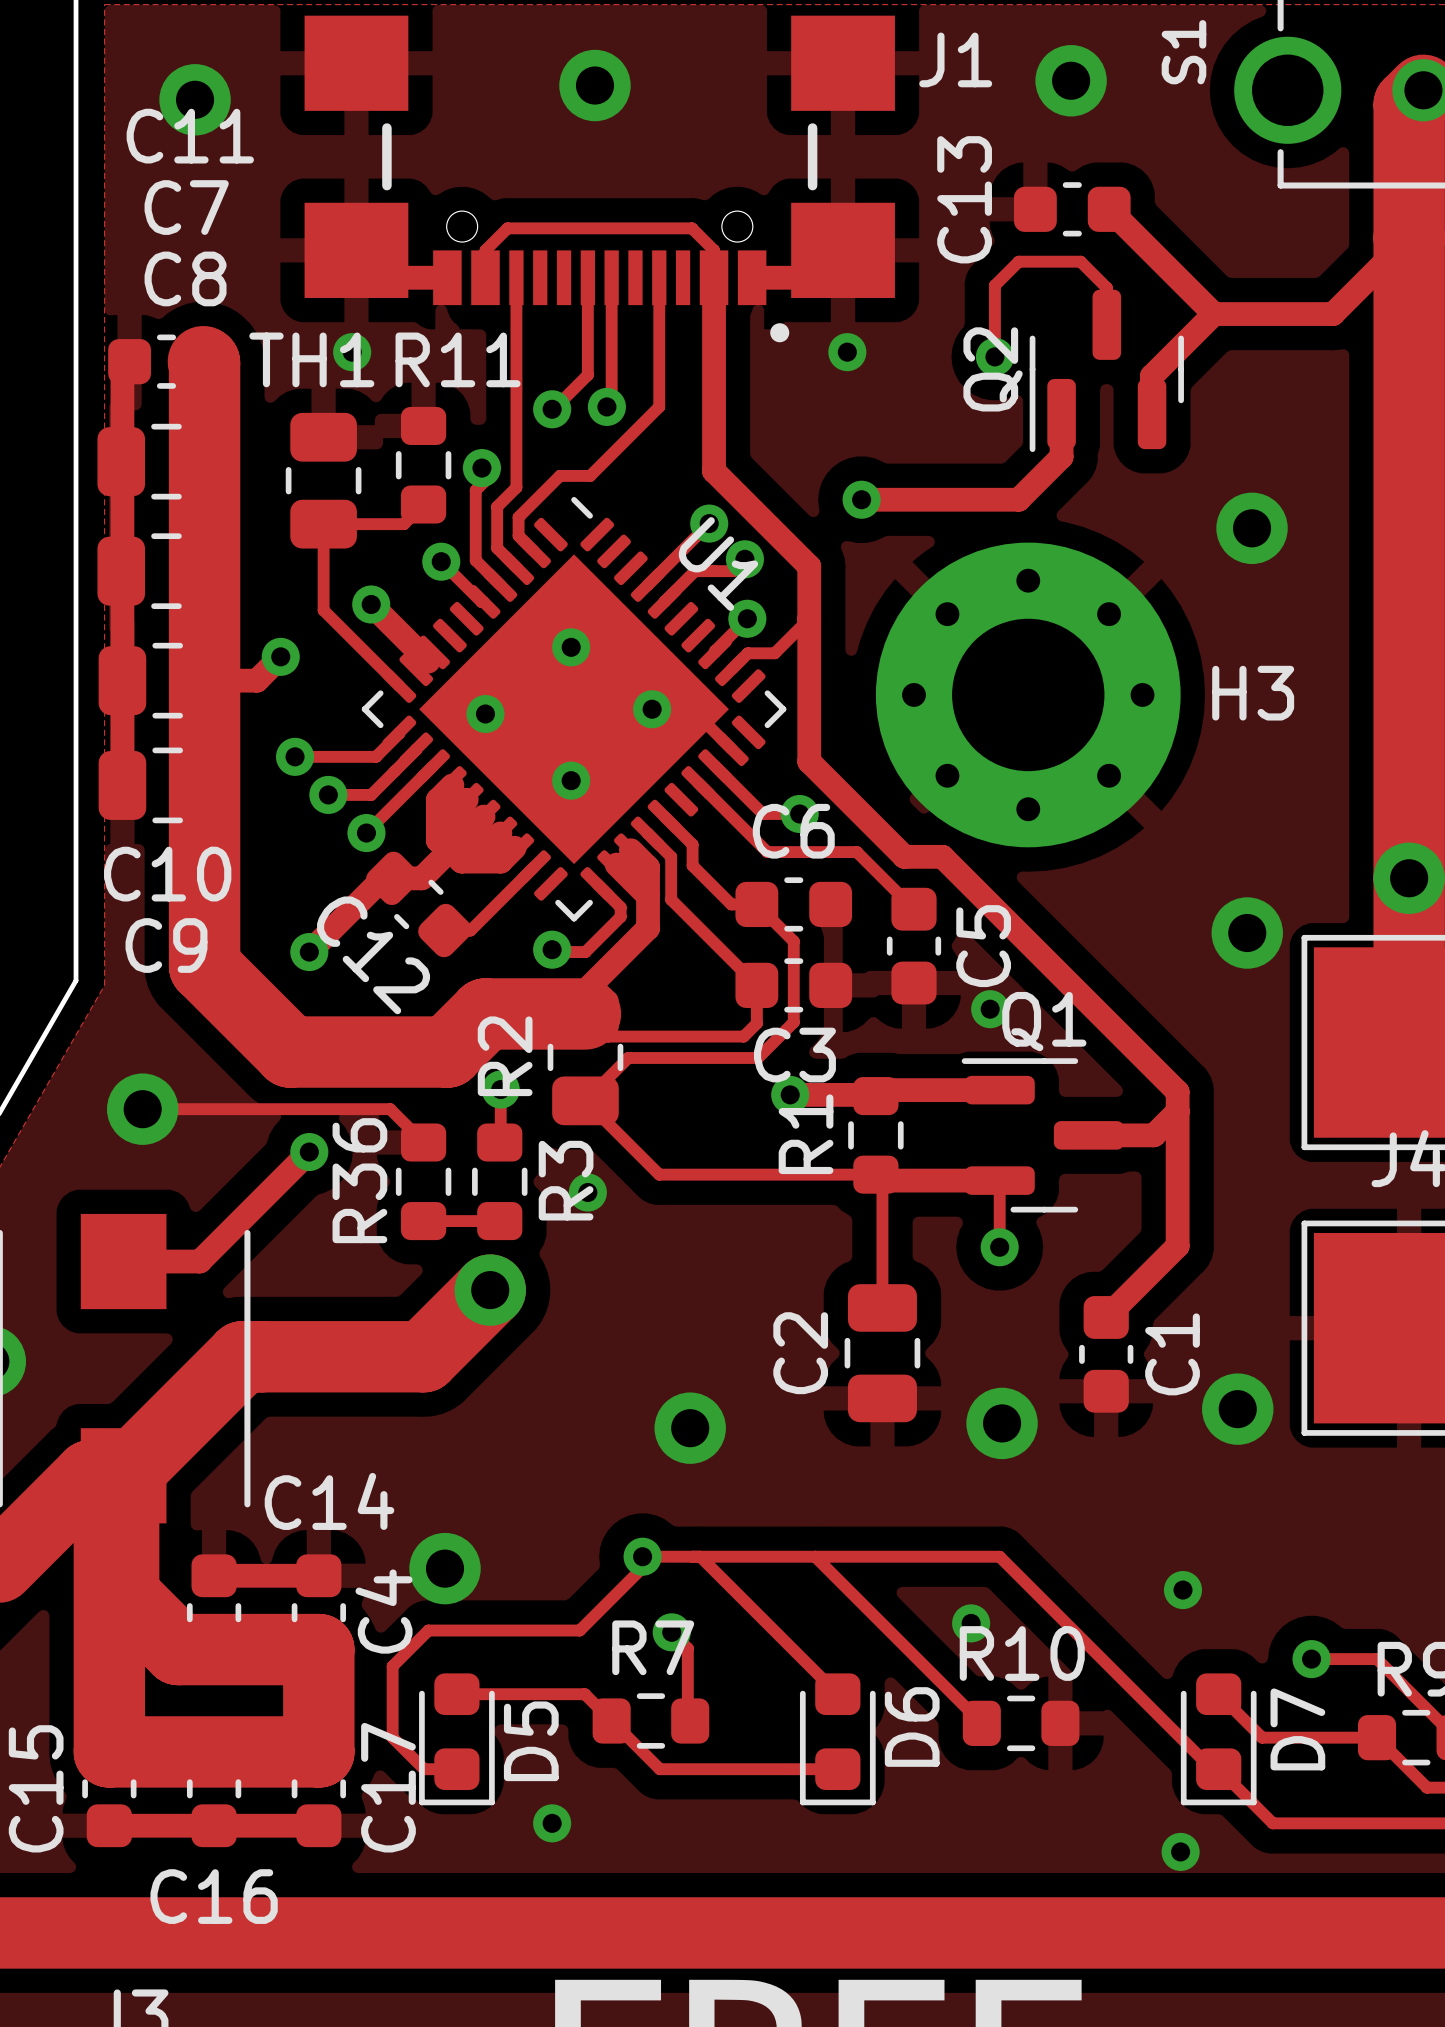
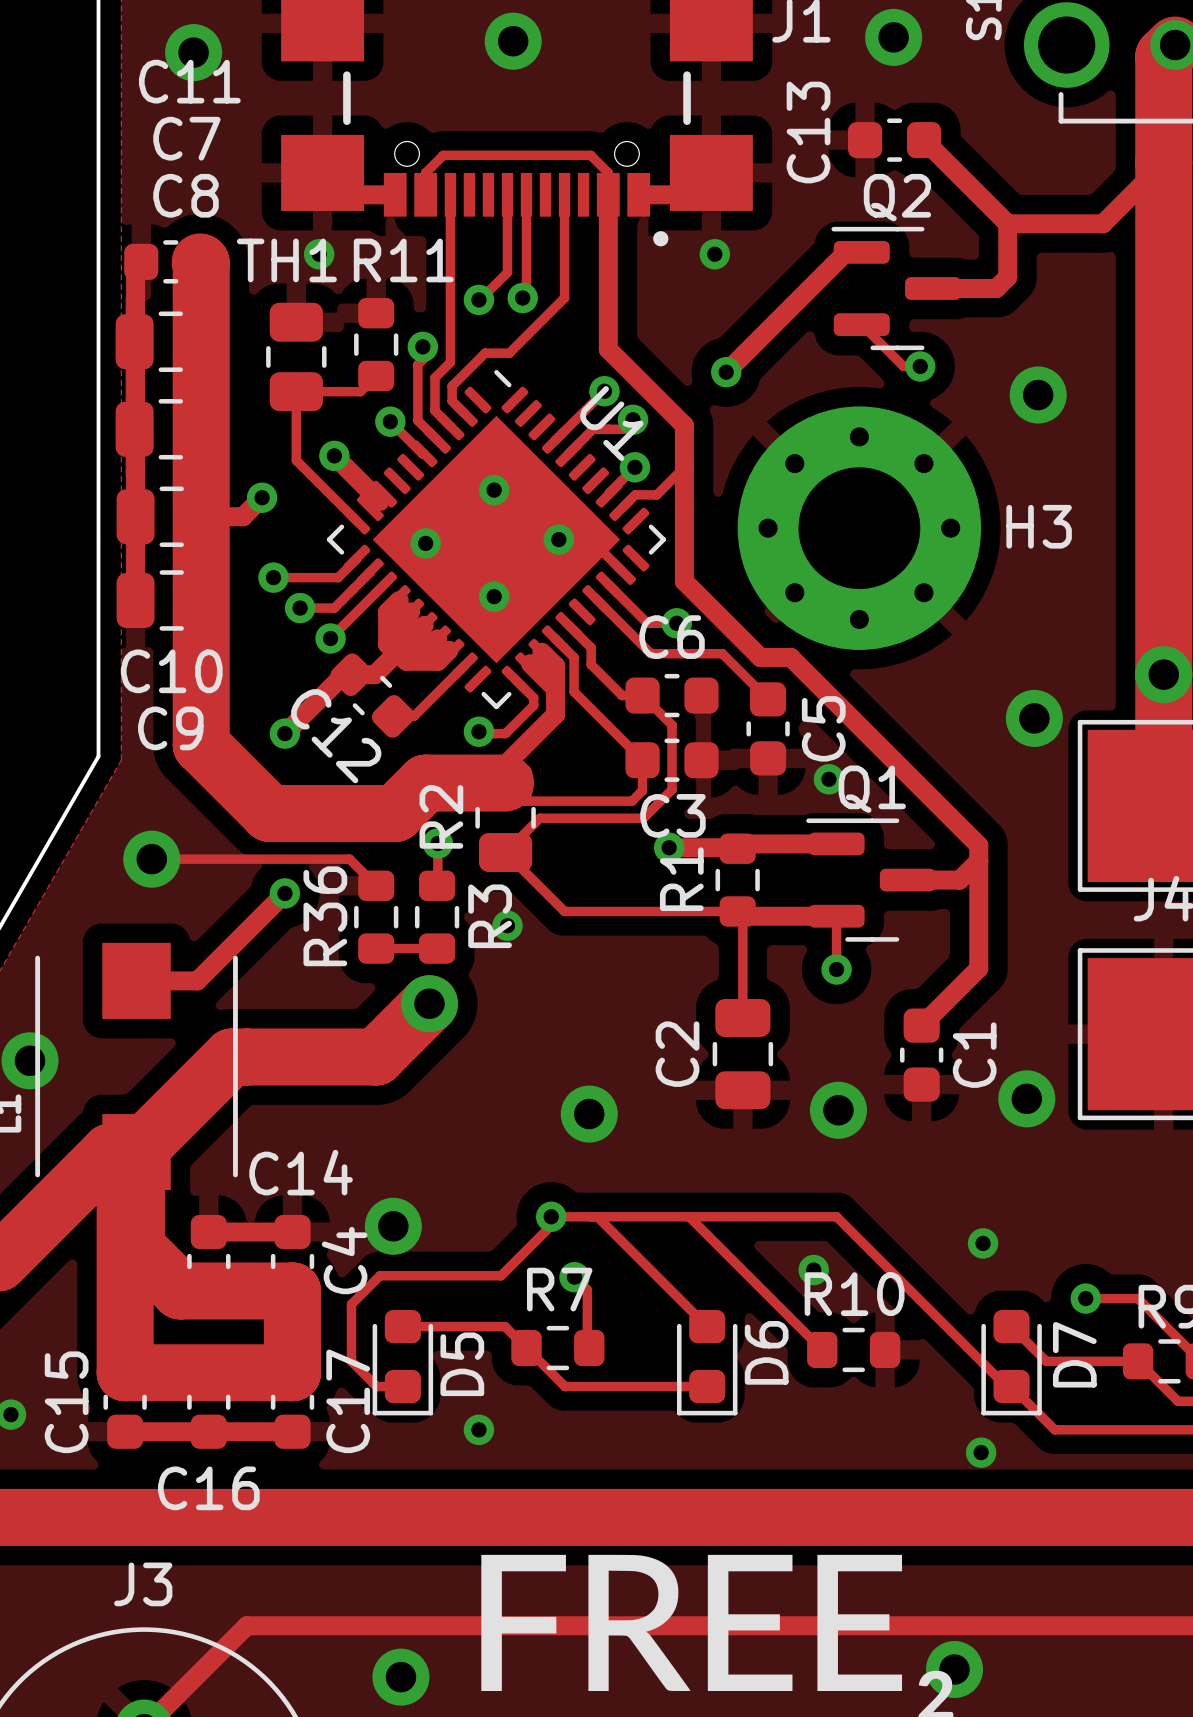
track: (1213, 314) (1152, 375) (1152, 414) -> (1007, 223) (1007, 277) (996, 288) (933, 288)
track: (1106, 324) (1106, 287) (1080, 261) (1018, 261) (994, 285) (994, 356) -> none
via position: (994, 356) -> (920, 366)
Q2 rotation: 0° (1106, 370) -> 90° clockwise (896, 288)
track: (1061, 414) (1061, 456) (1018, 499) (861, 499) -> (861, 252) (846, 252) (726, 372)
track: none -> (861, 324) (903, 366) (920, 366)

